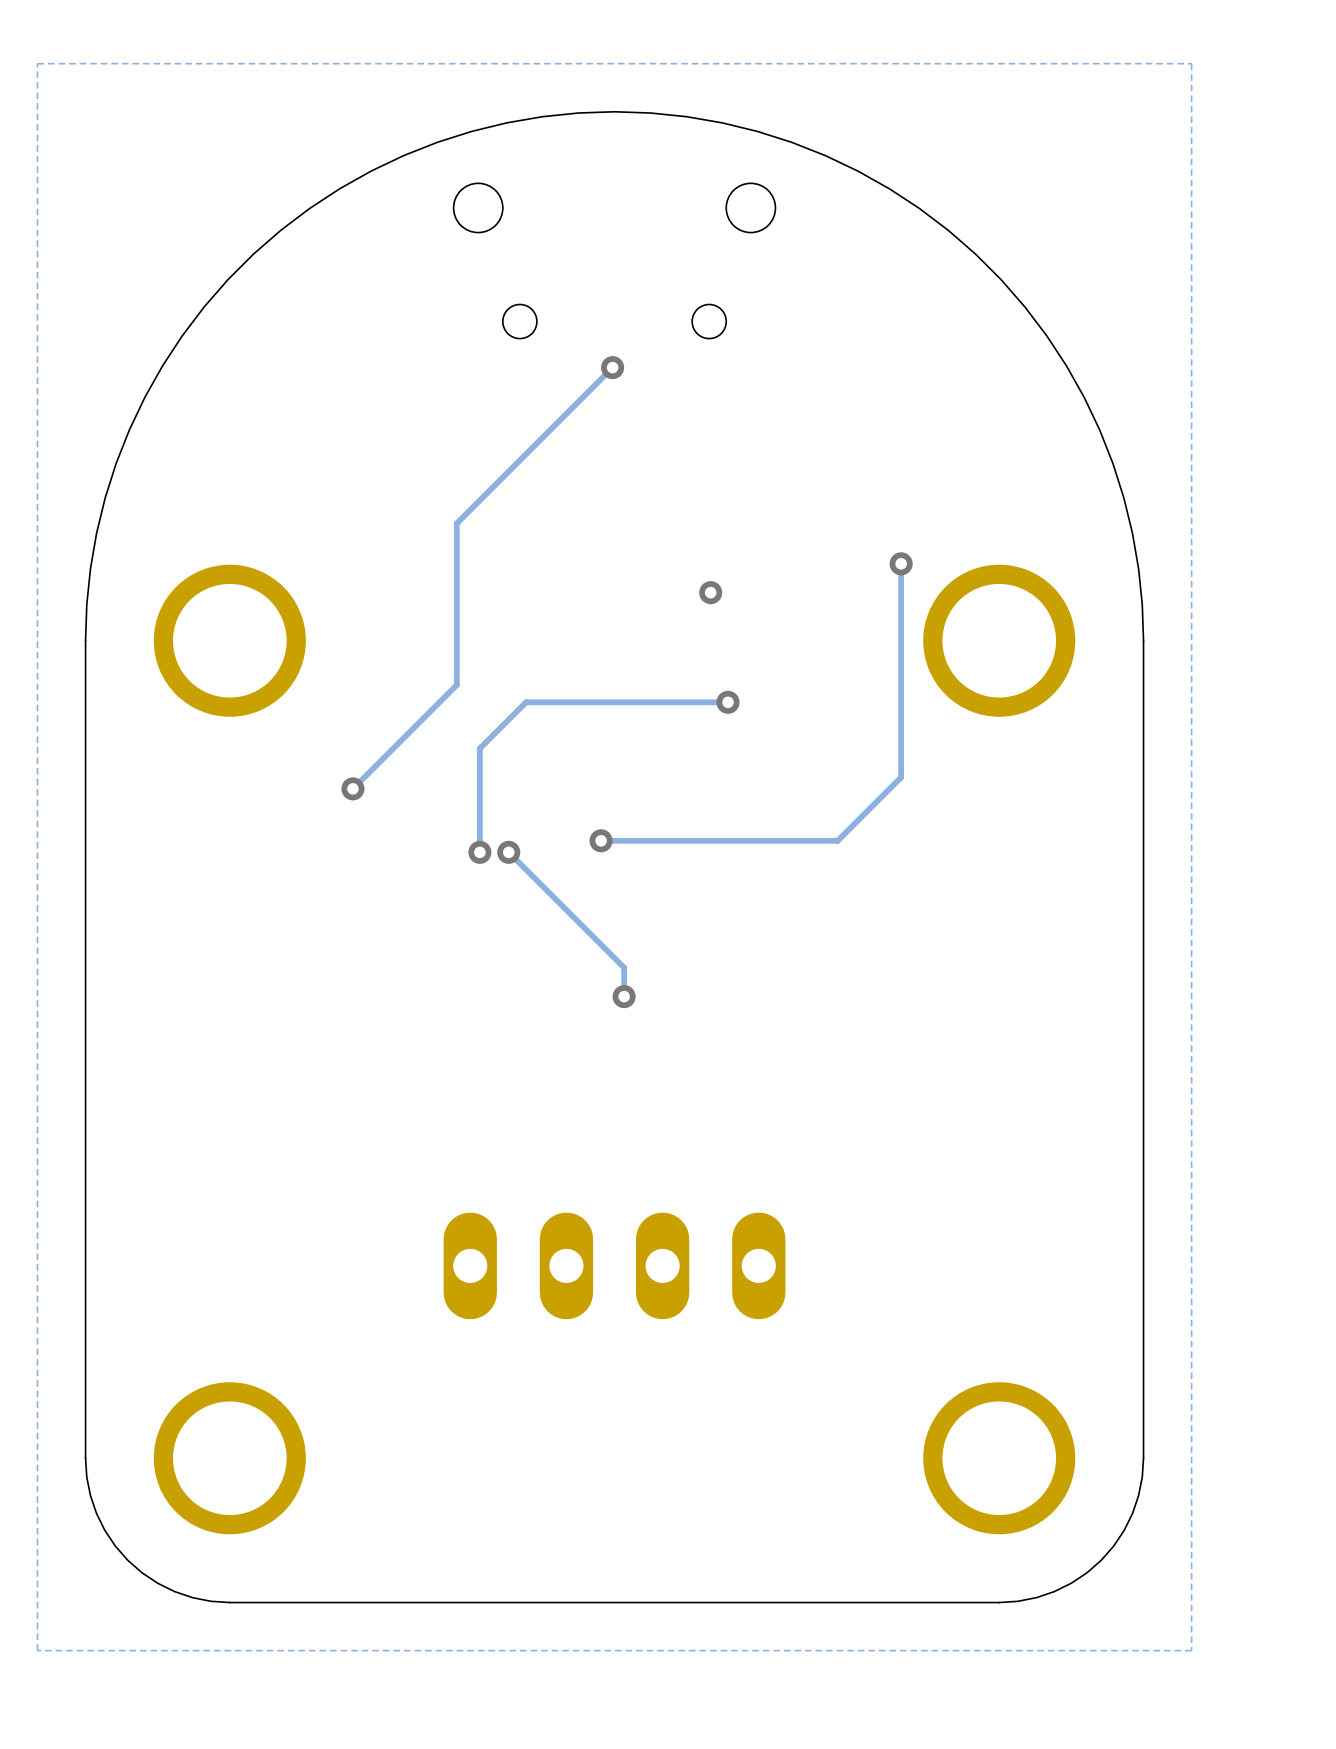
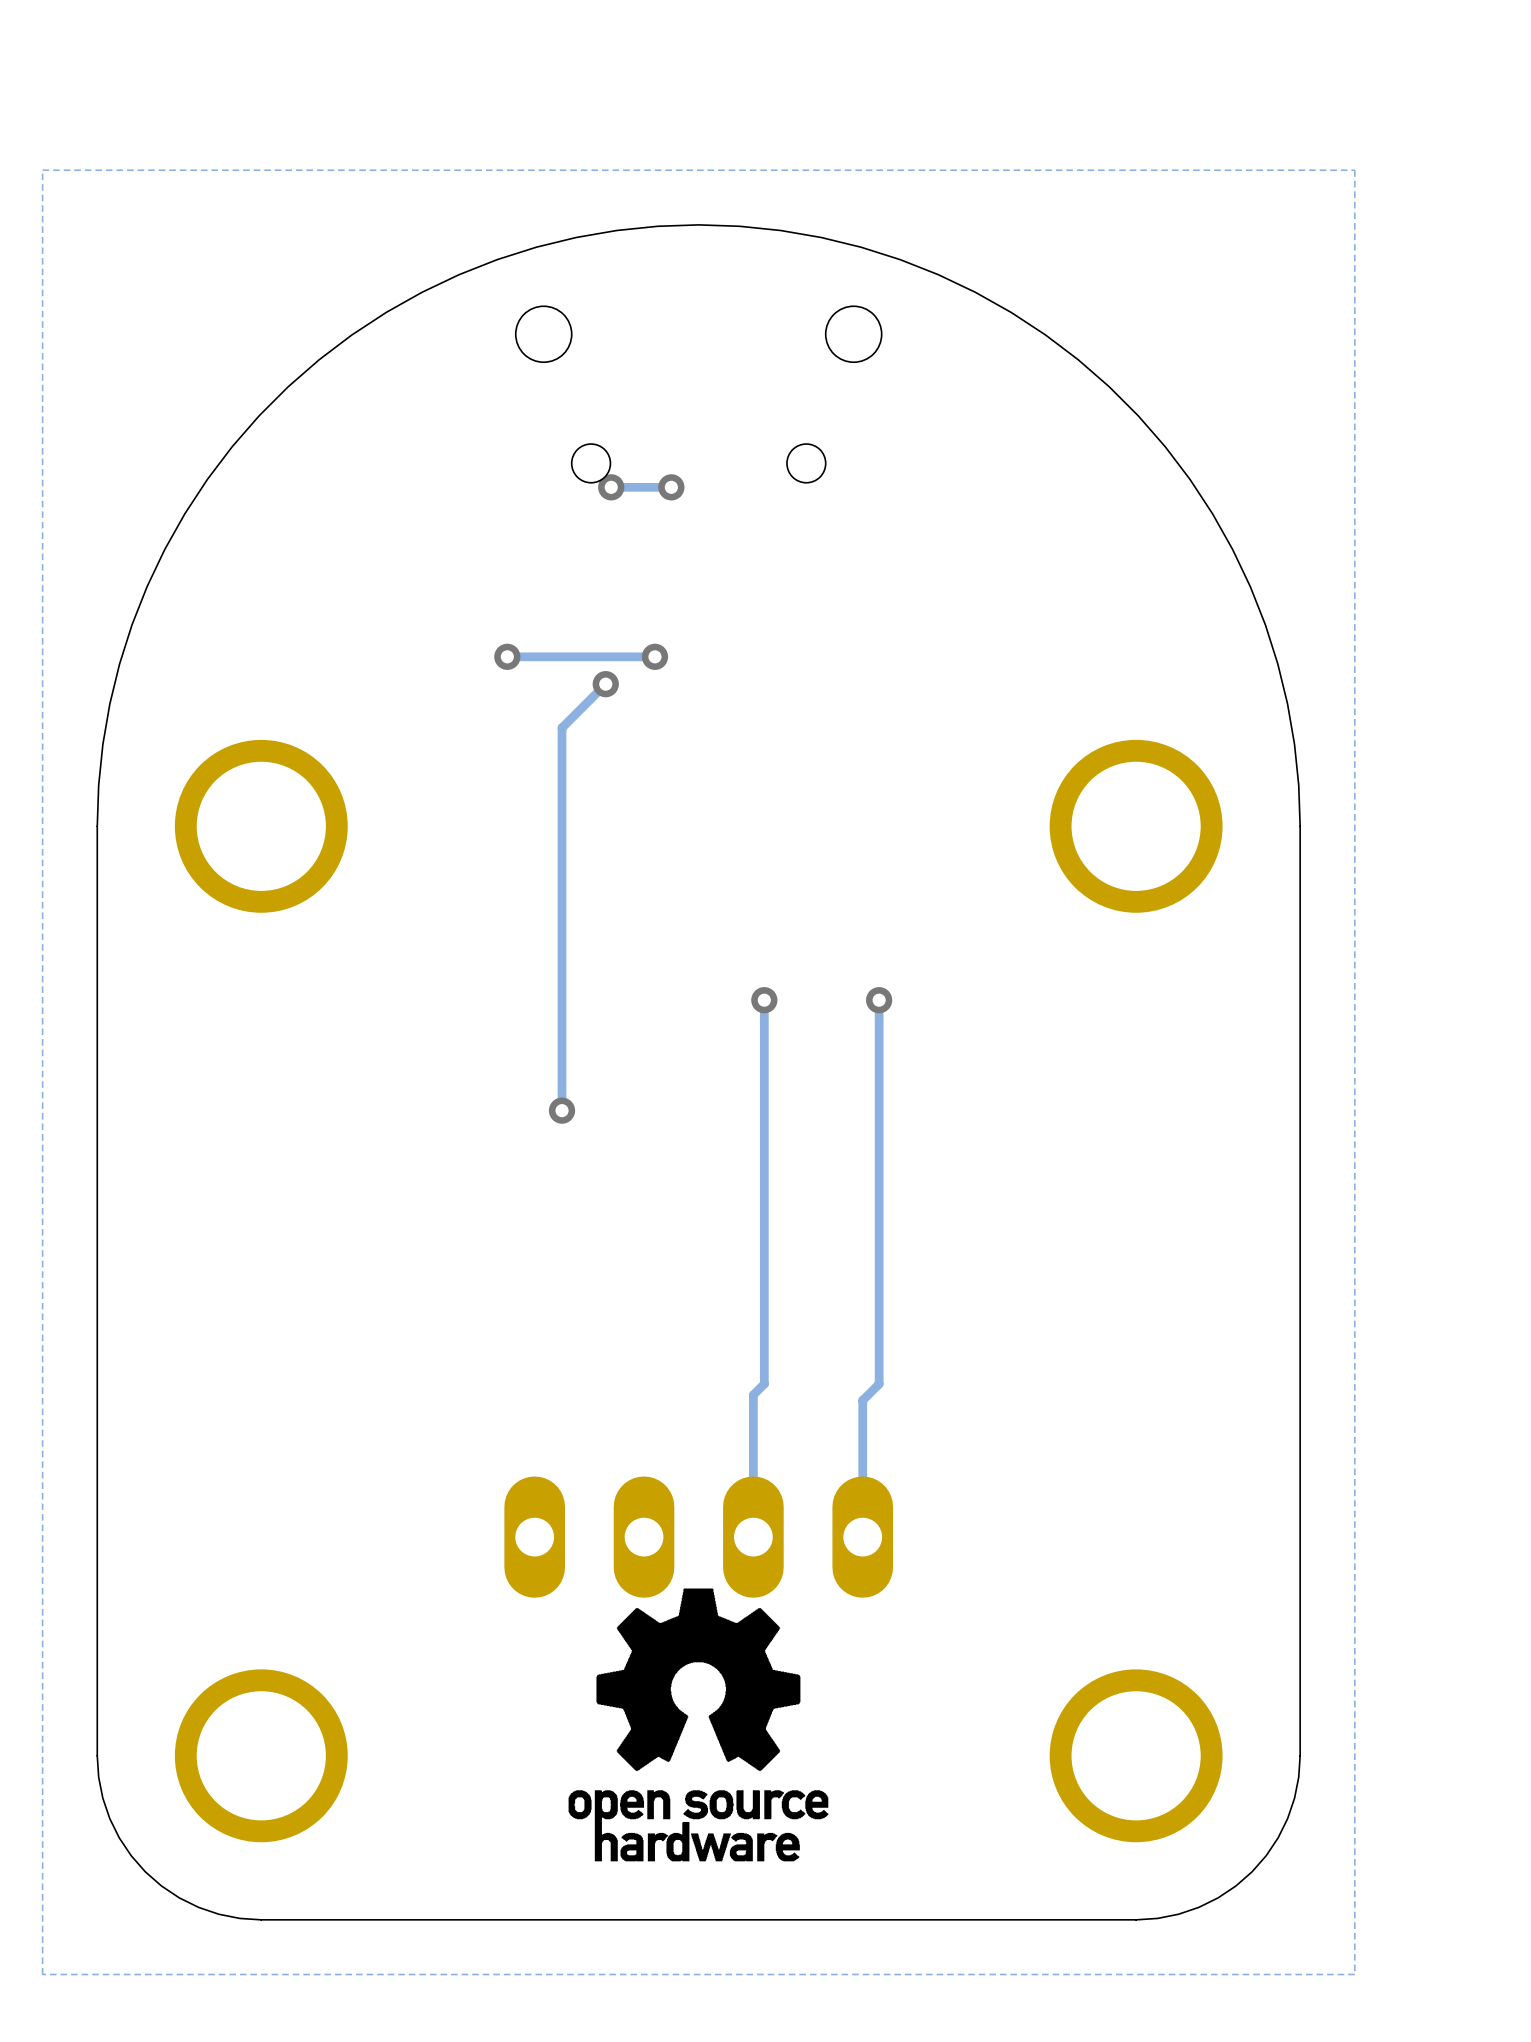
via: none -> (611, 487)
track: none -> (671, 487) (611, 487)
track: (612, 367) (456, 523) (456, 685) (352, 788) -> none
via position: (612, 367) -> (671, 487)
via: none -> (507, 656)
track: none -> (654, 656) (507, 656)
via: none -> (654, 656)
track: none -> (605, 684) (562, 727) (562, 1110)
via: none -> (605, 684)
track: (901, 563) (901, 777) (837, 840) (601, 840) -> none
via: (901, 563) -> none
via: (710, 592) -> none
track: (728, 702) (526, 702) (479, 748) (479, 852) -> none
via: (728, 702) -> none
via: (352, 788) -> none
track: none -> (764, 1000) (764, 1384) (753, 1394) (753, 1537)
via: none -> (764, 1000)
track: none -> (879, 1000) (879, 1384) (862, 1400) (862, 1537)
via: none -> (879, 1000)
via: (601, 840) -> none
via: (479, 852) -> none
track: (508, 852) (624, 967) (624, 996) -> none
via: (508, 852) -> none
via: none -> (562, 1110)
via: (624, 996) -> none
drawing: none -> [568, 1588, 829, 1862]

